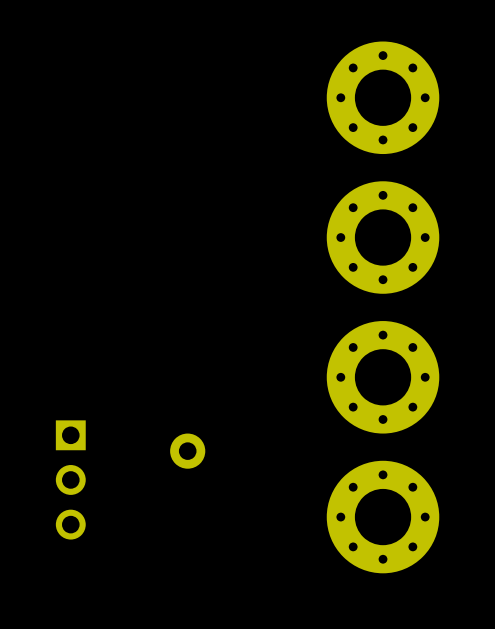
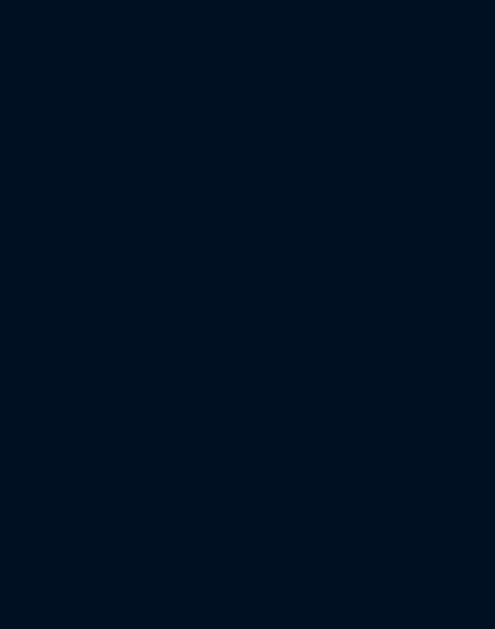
part: (383, 97) -> none
part: (383, 237) -> none
part: (383, 377) -> none
part: (187, 451) -> none
part: (70, 479) -> none
part: (383, 517) -> none

